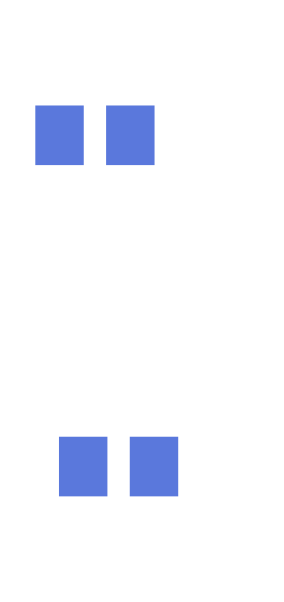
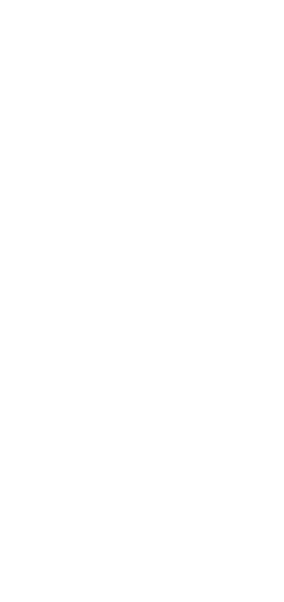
part: (94, 135) -> none
part: (118, 466) -> none

